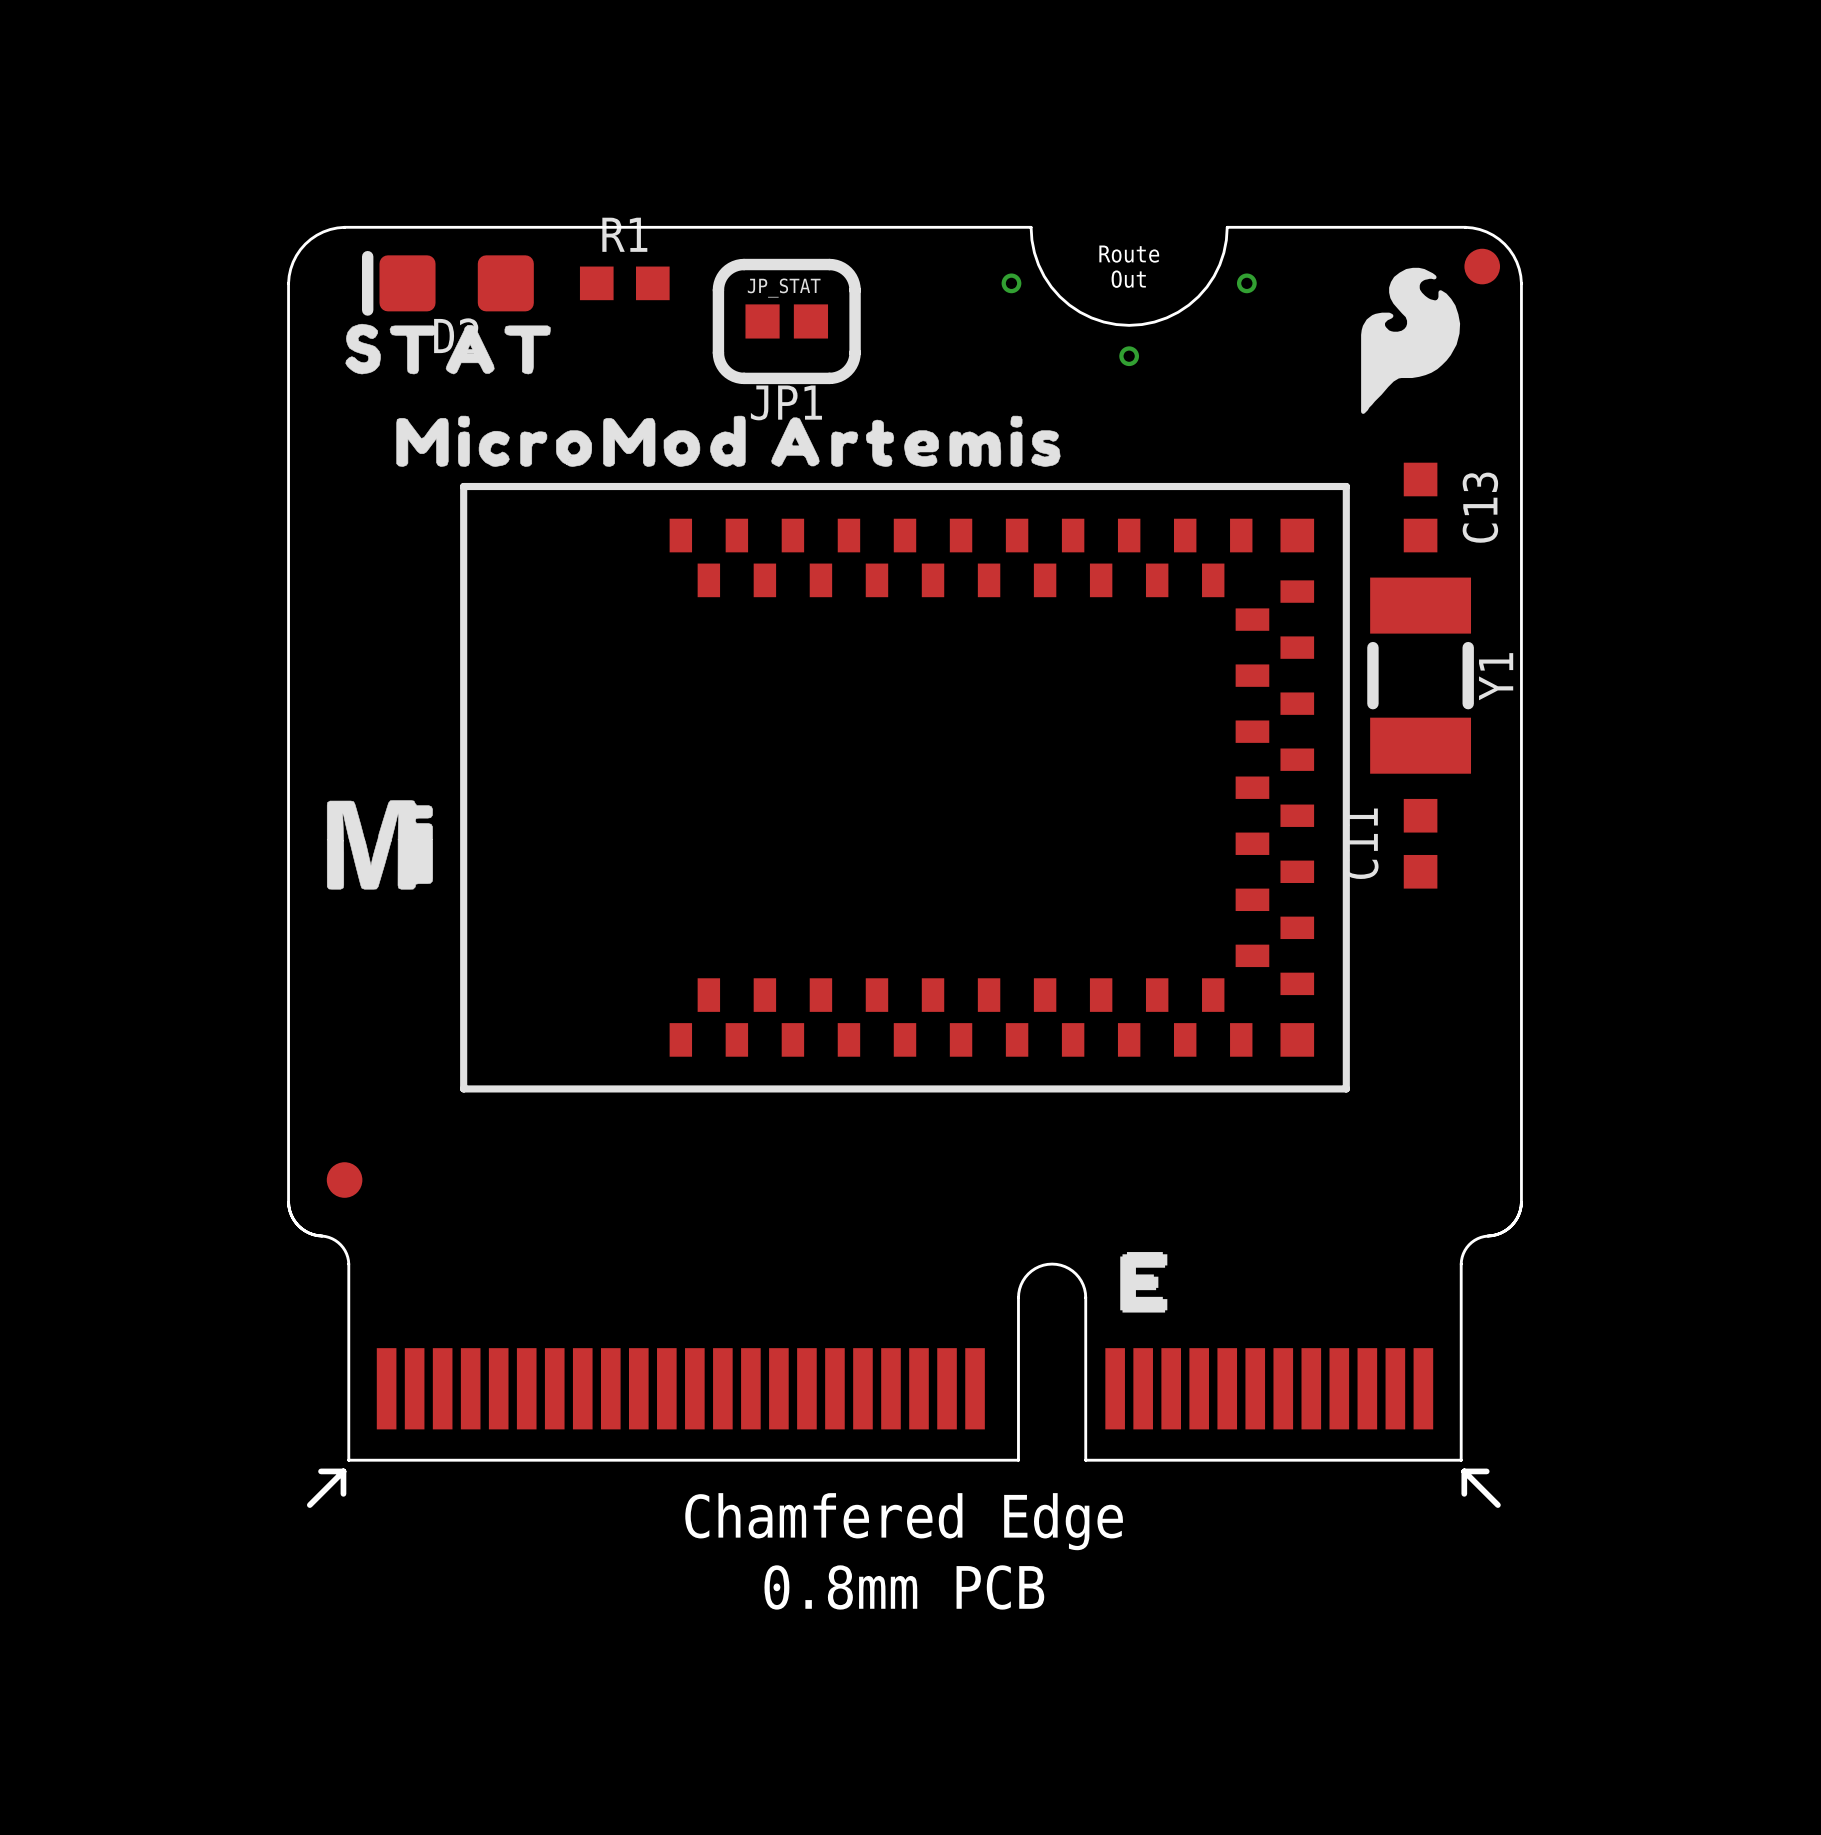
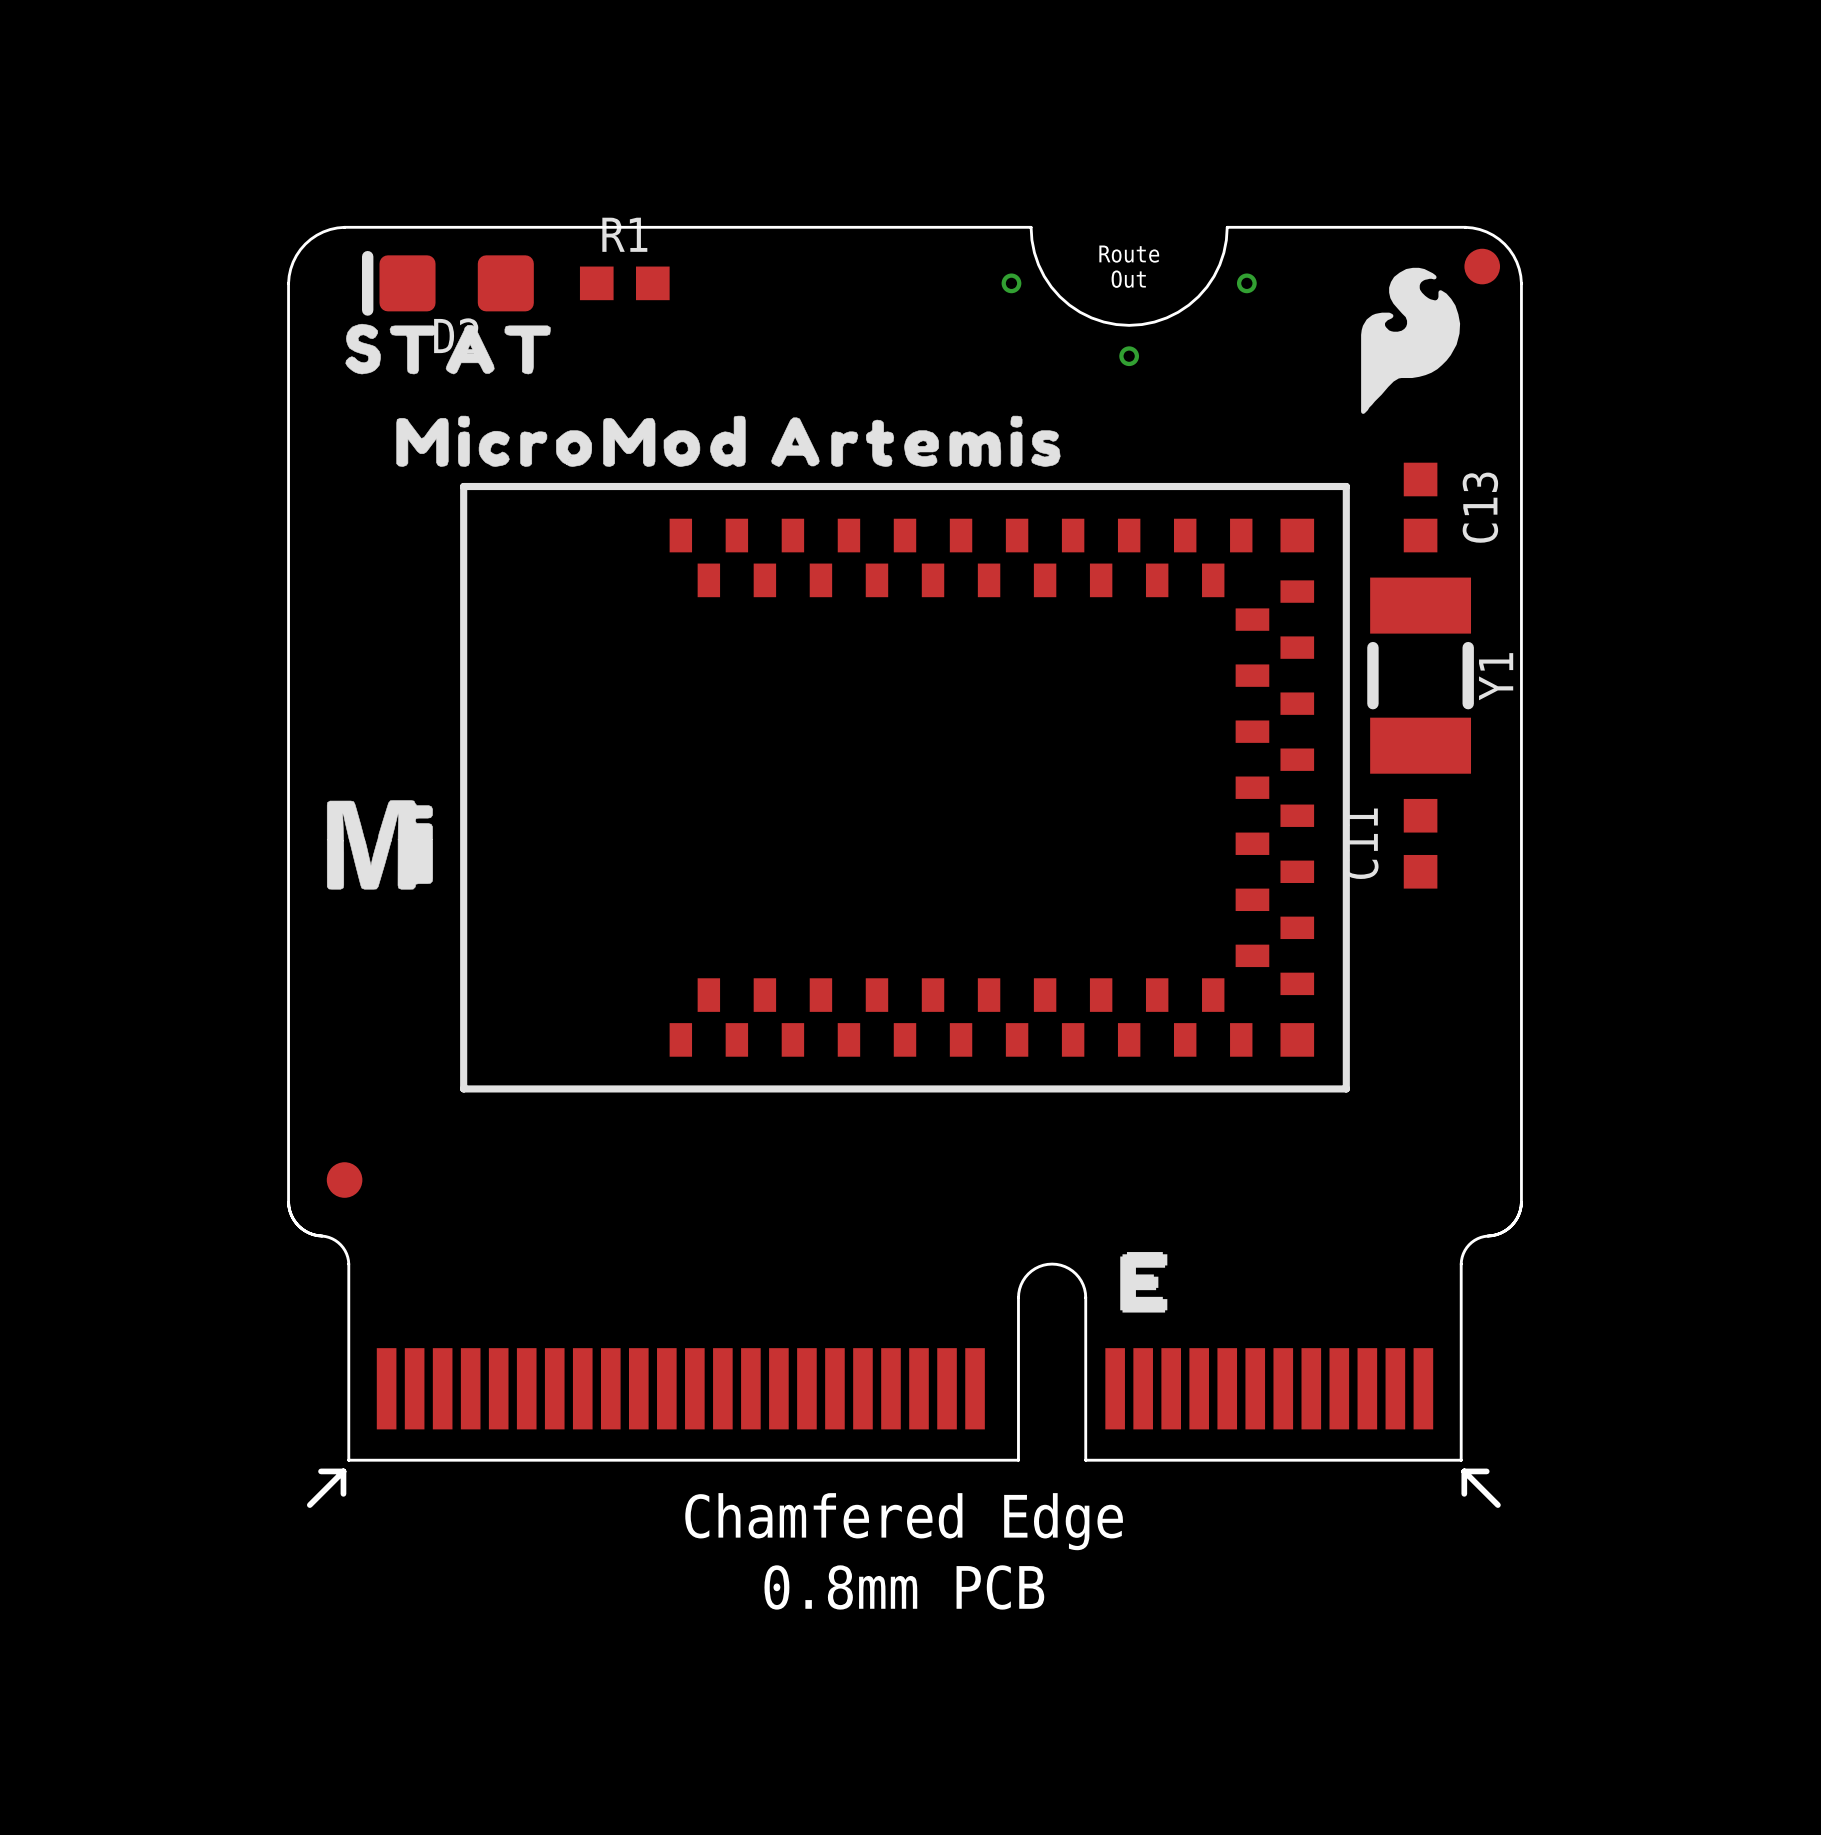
text: JP_STAT (784, 288) -> none
JP1: (786, 321) -> none

